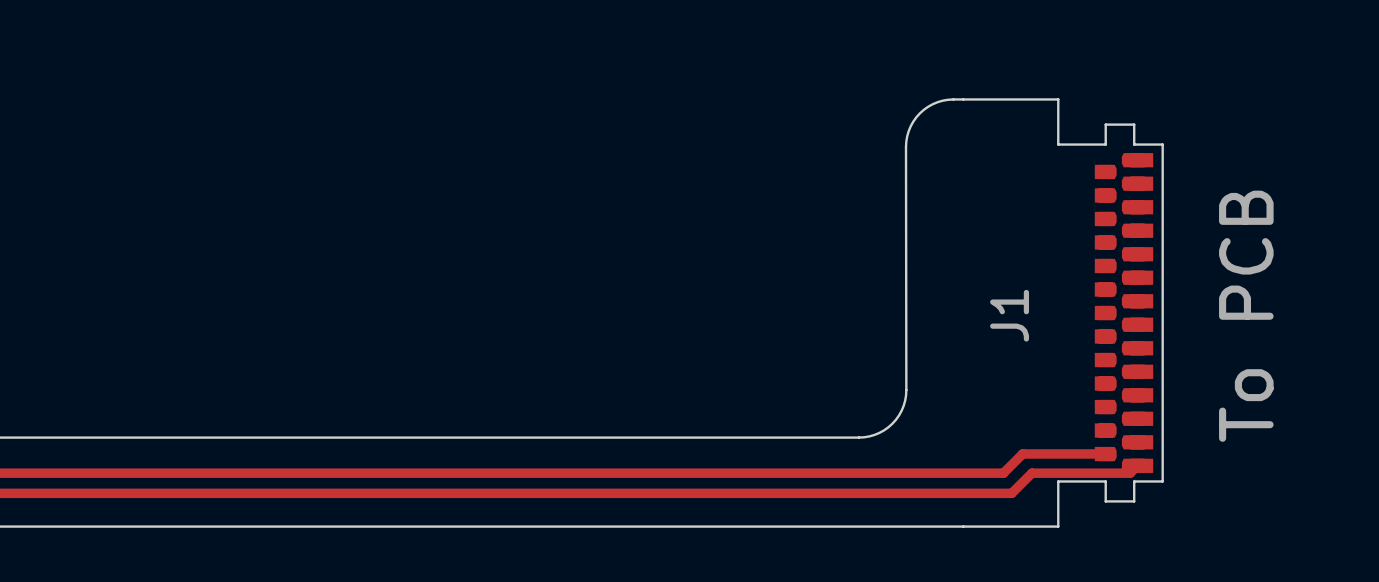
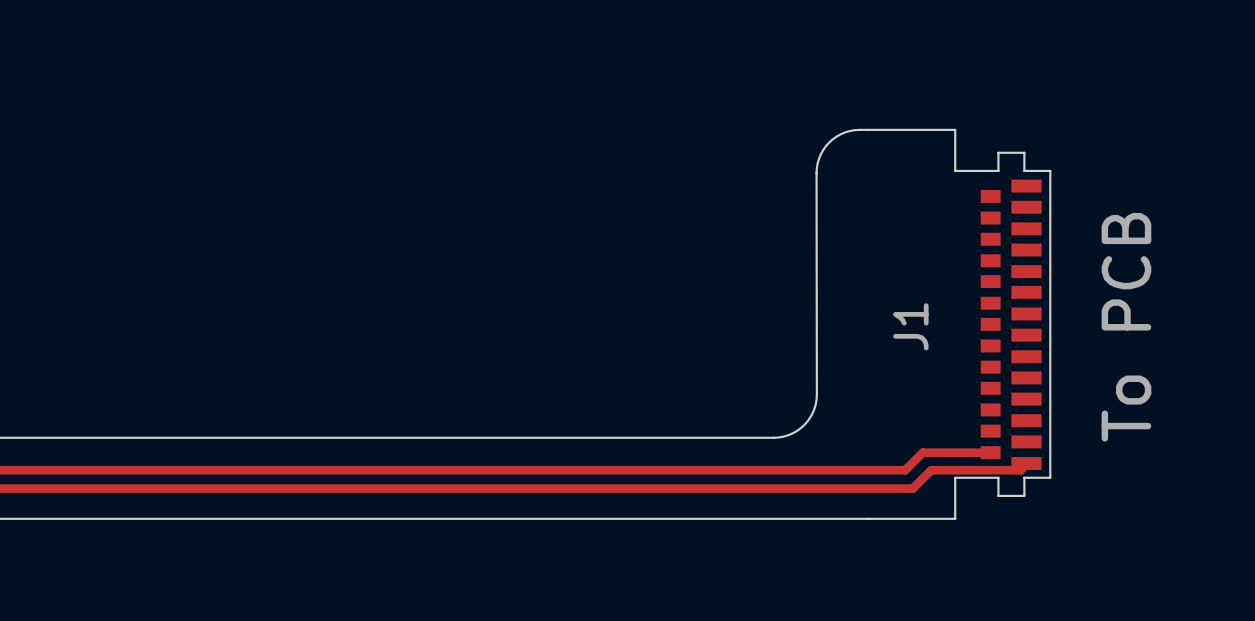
J1 footprint: [962, 98, 1164, 528] -> [867, 128, 1052, 520]

